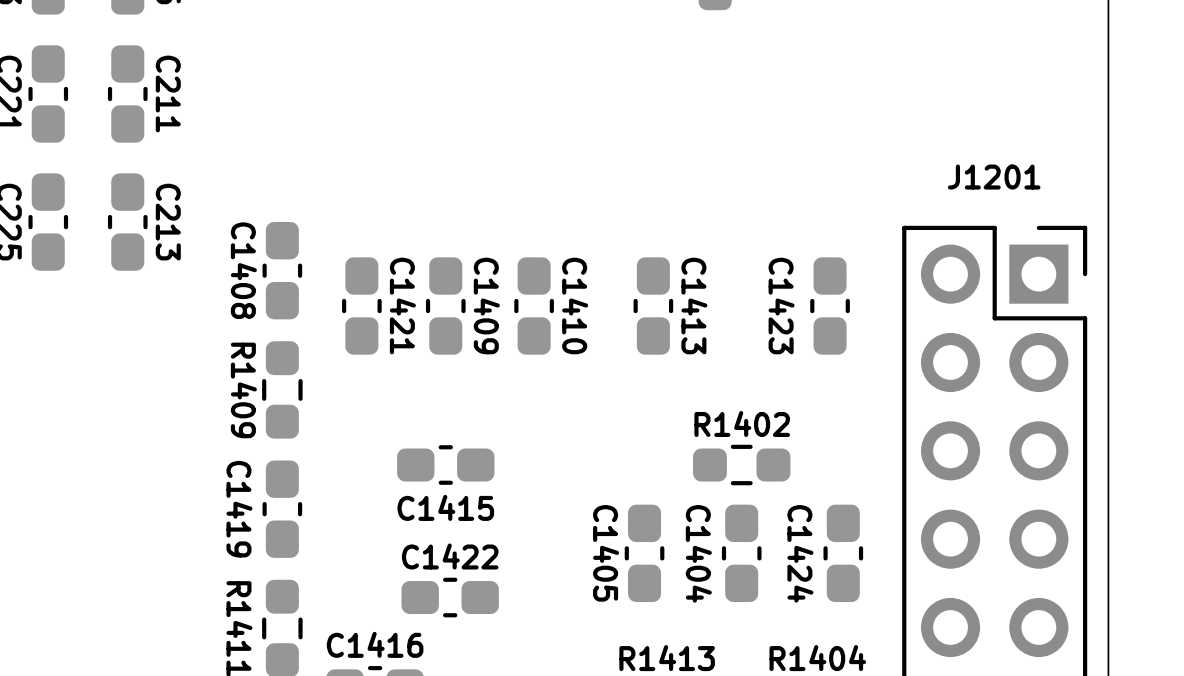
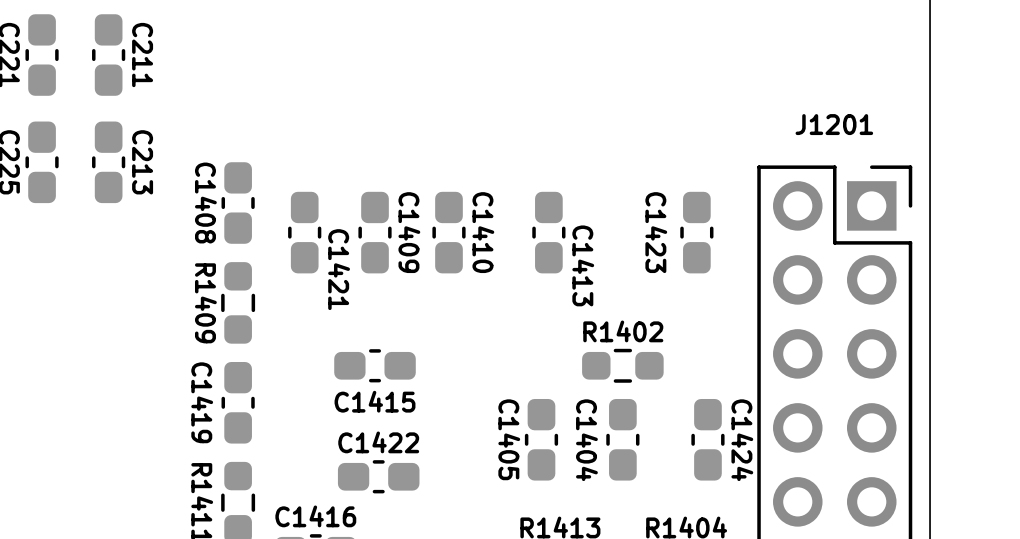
C1421 name position: C1421 (402, 306) -> C1421 (339, 269)
C1413 name position: C1413 (694, 306) -> C1413 (583, 265)
C1424 name position: C1424 (800, 553) -> C1424 (742, 440)

